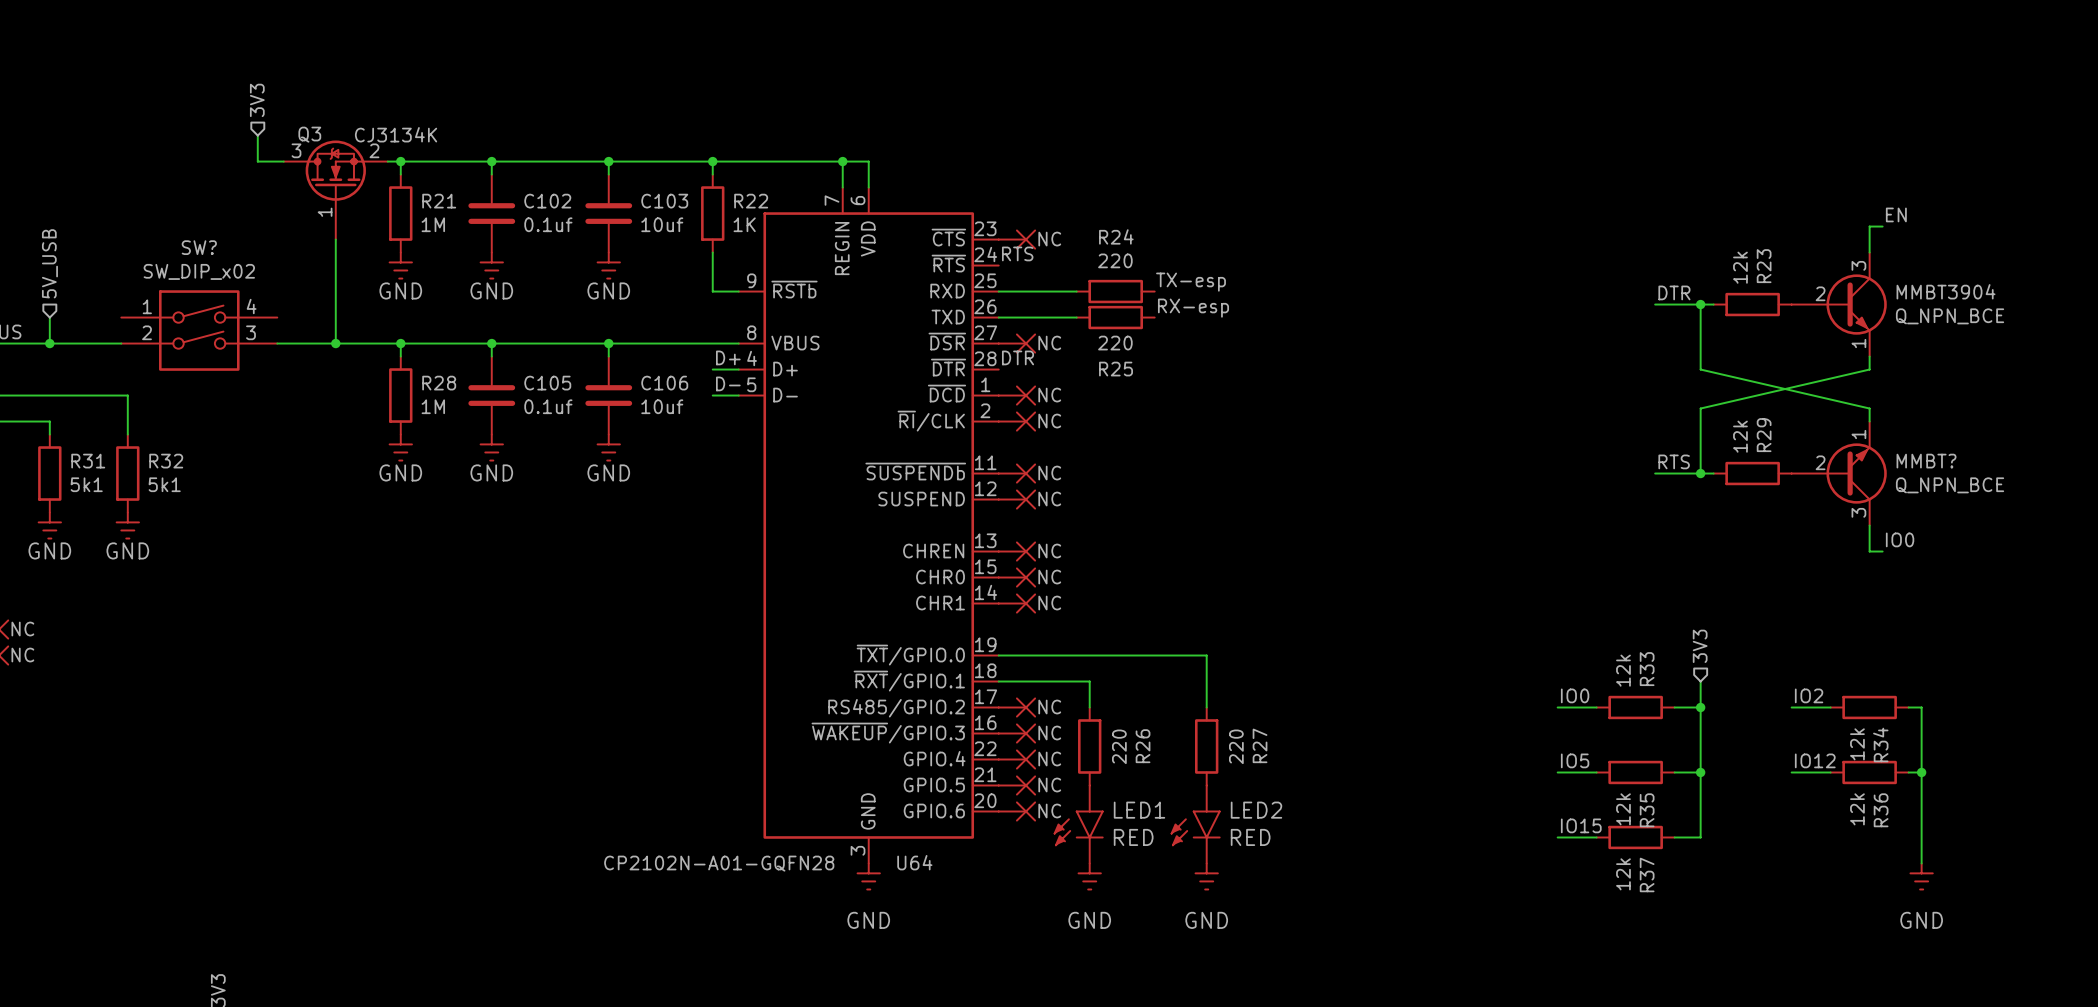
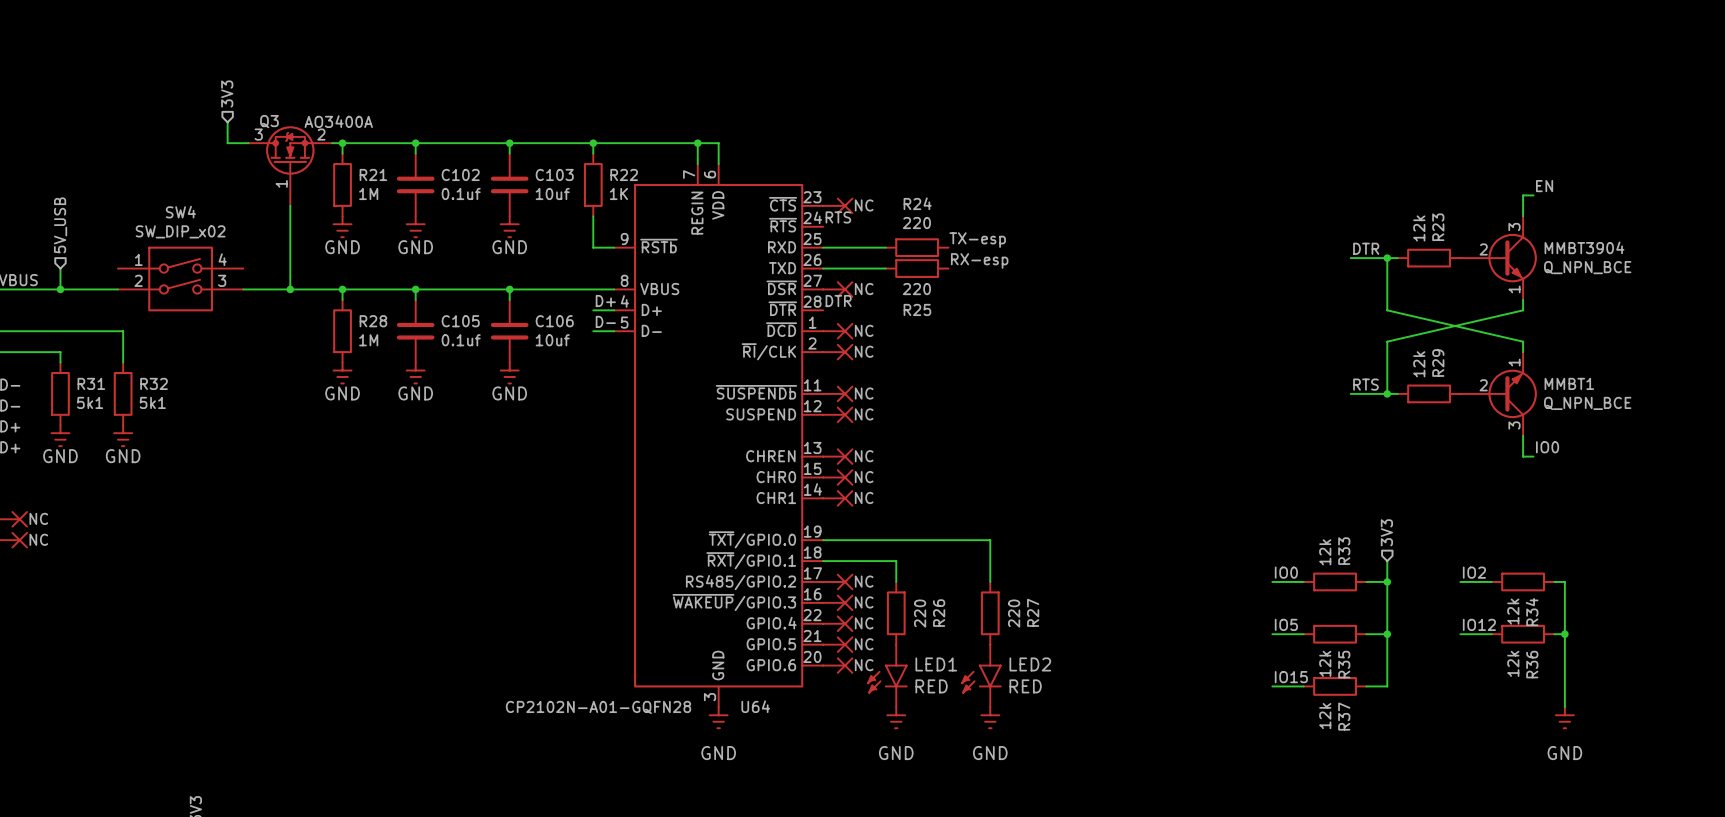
Q3 value: CJ3134K (396, 134) -> AO3400A (338, 121)
SW? name: SW? (199, 247) -> SW4 (180, 212)
MMBT? name: MMBT? (1926, 461) -> MMBT1 (1569, 383)

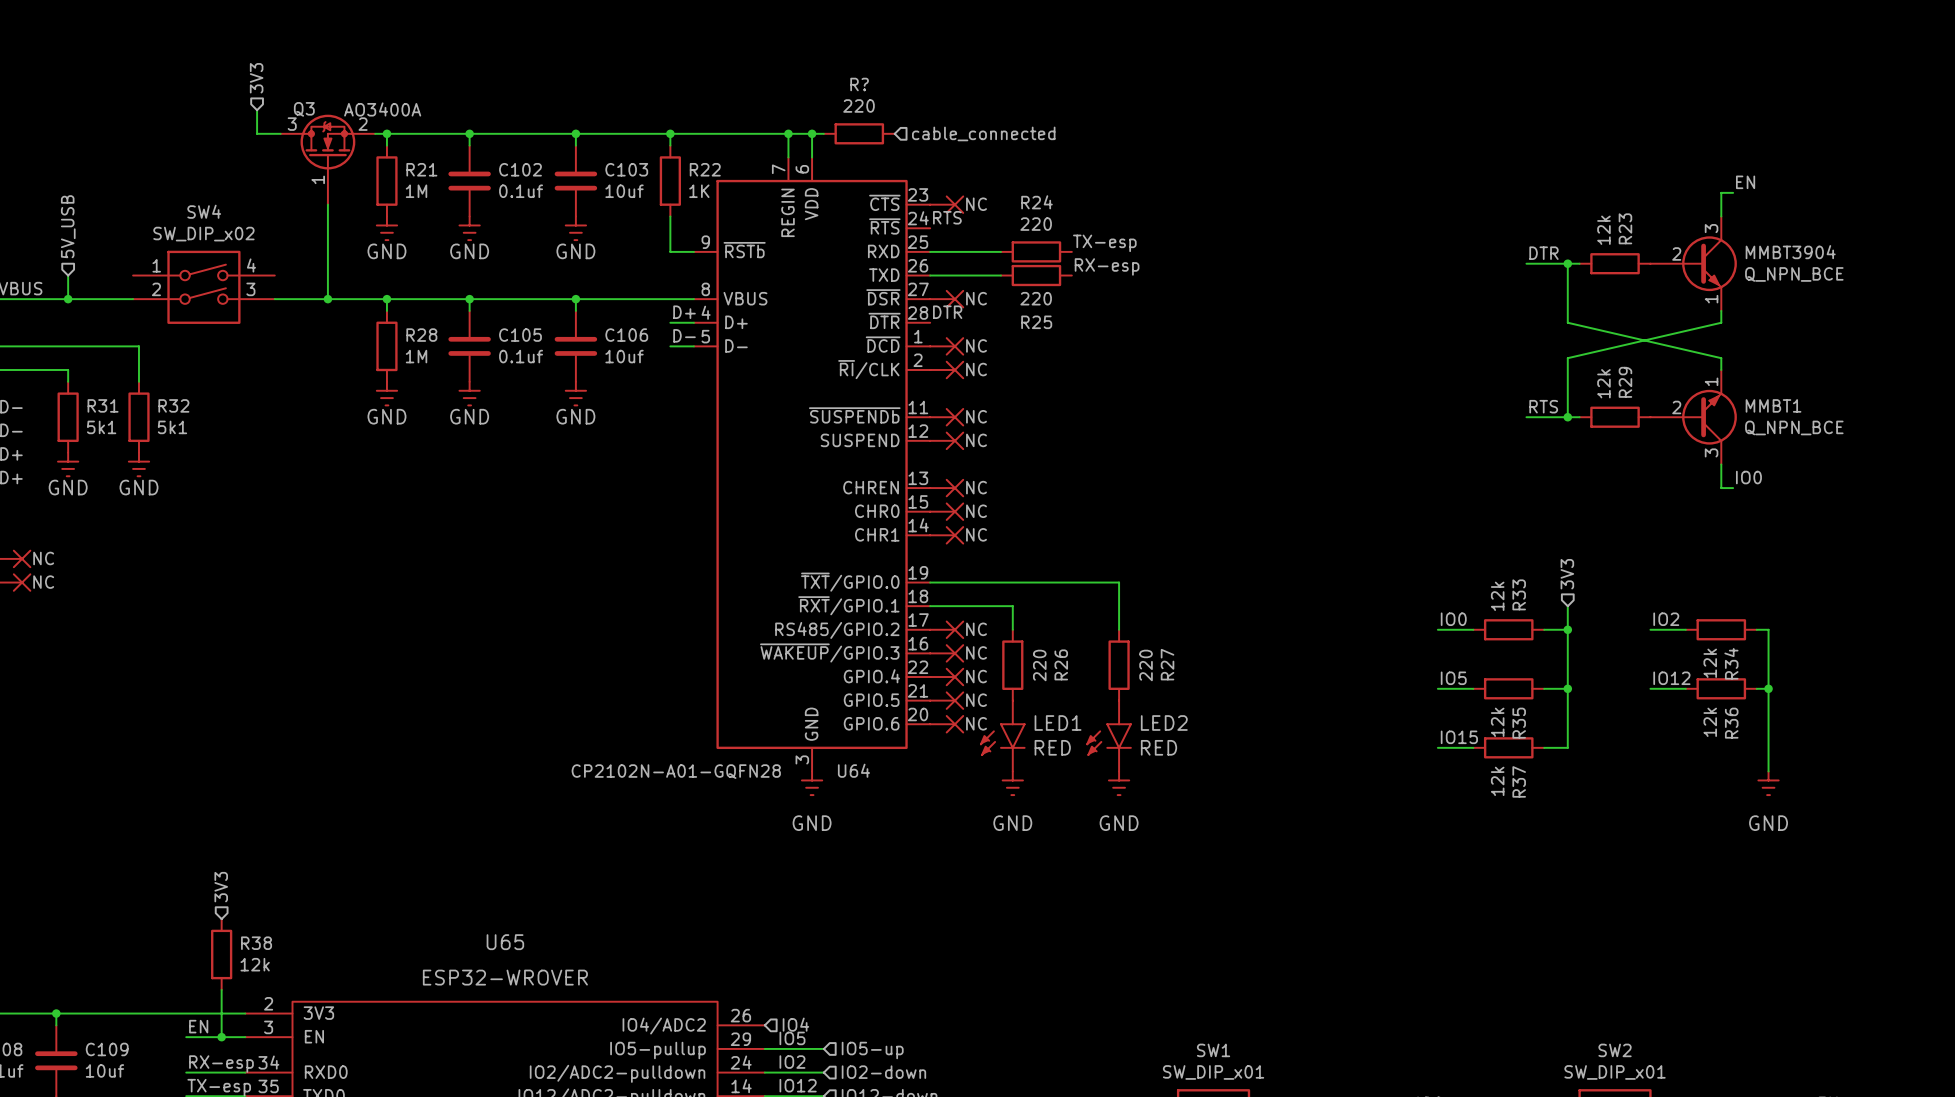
wire: none -> (812, 133) (823, 133)
junction: none -> (812, 133)
R?: none -> 220 (859, 133)
hierarchical label: none -> cable_connected (983, 133)

